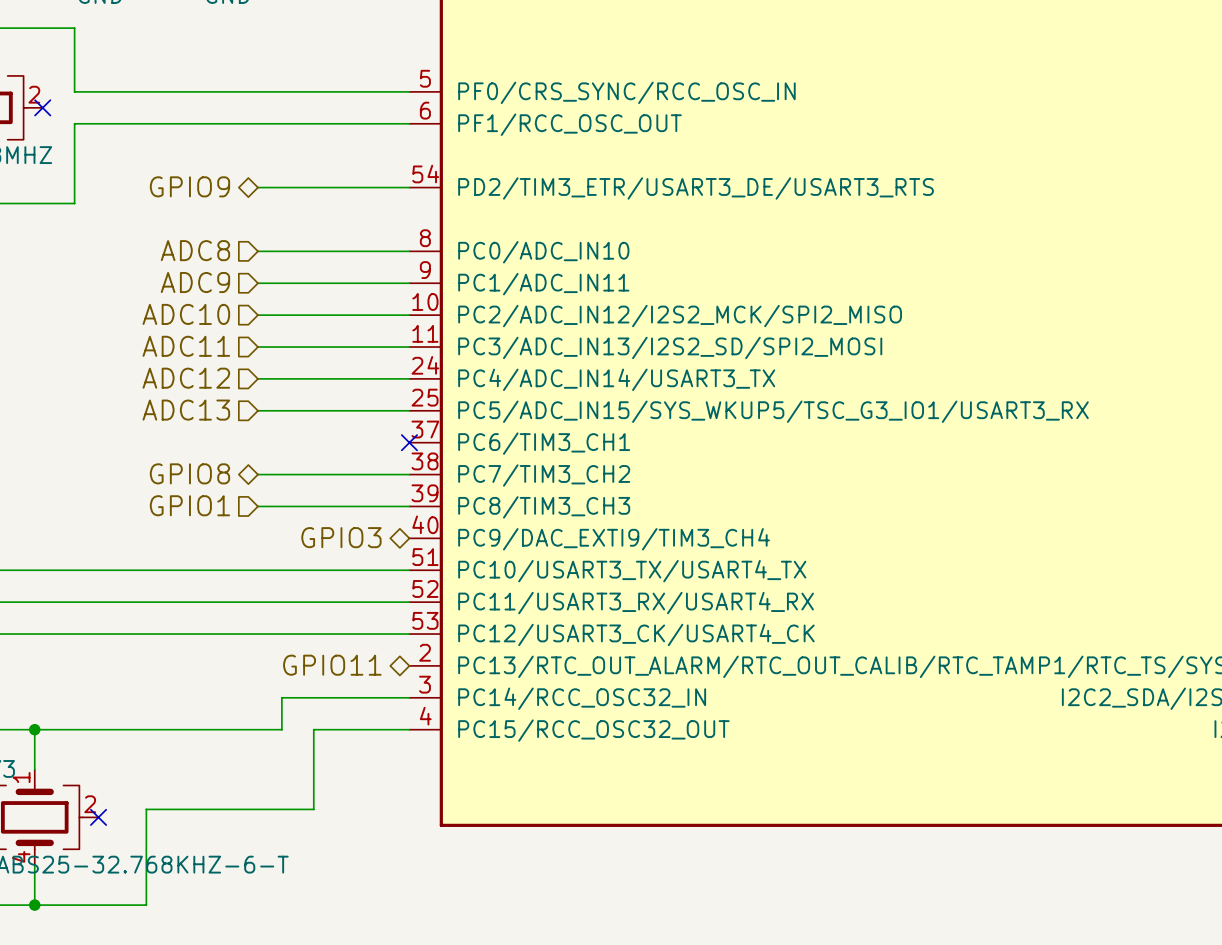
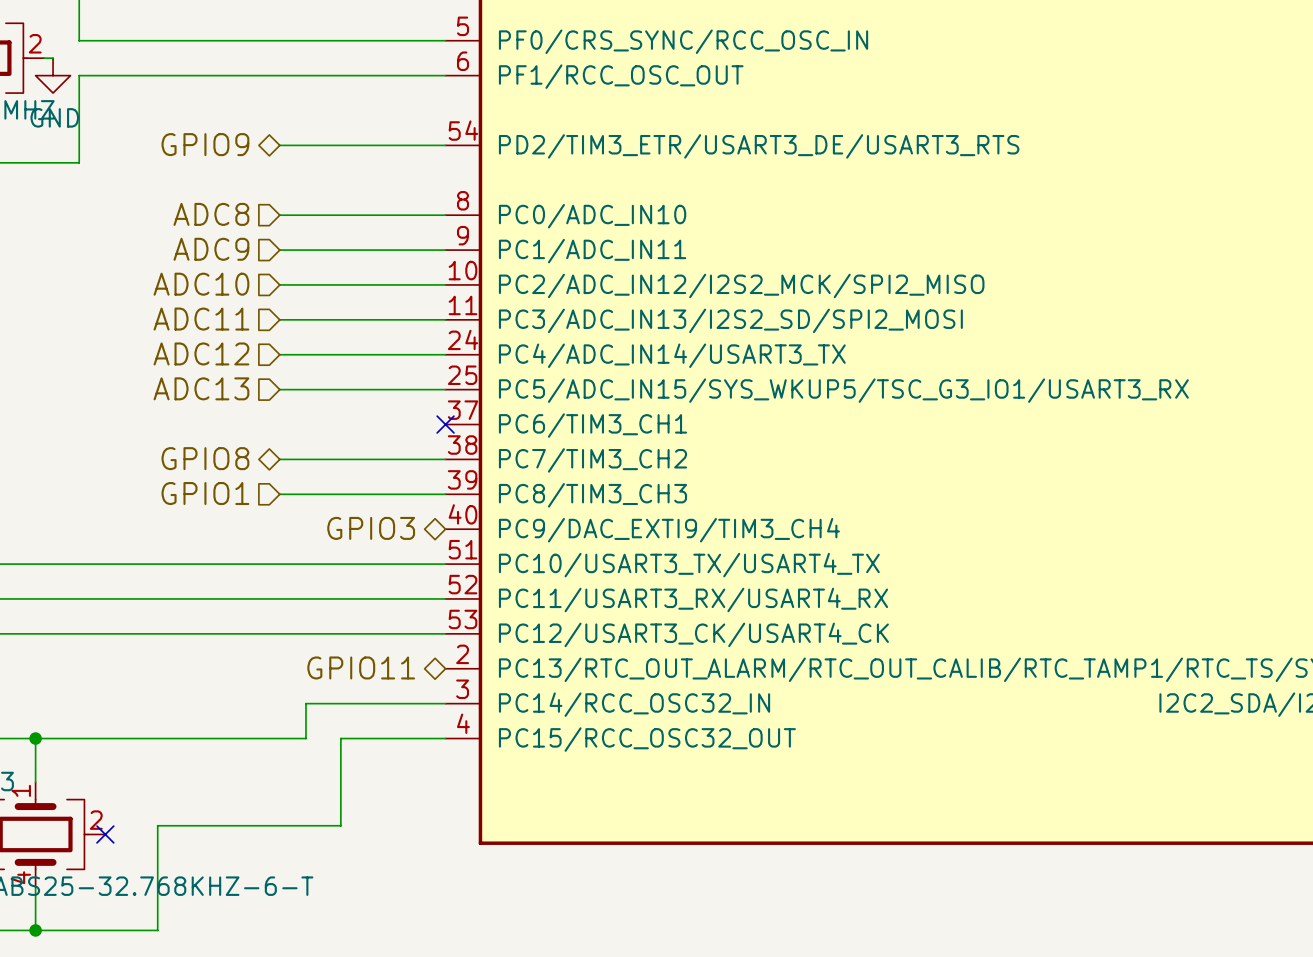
wire: none -> (44, 58) (53, 58)
no-connect mark: (42, 107) -> none
power symbol: none -> GND (53, 75)

